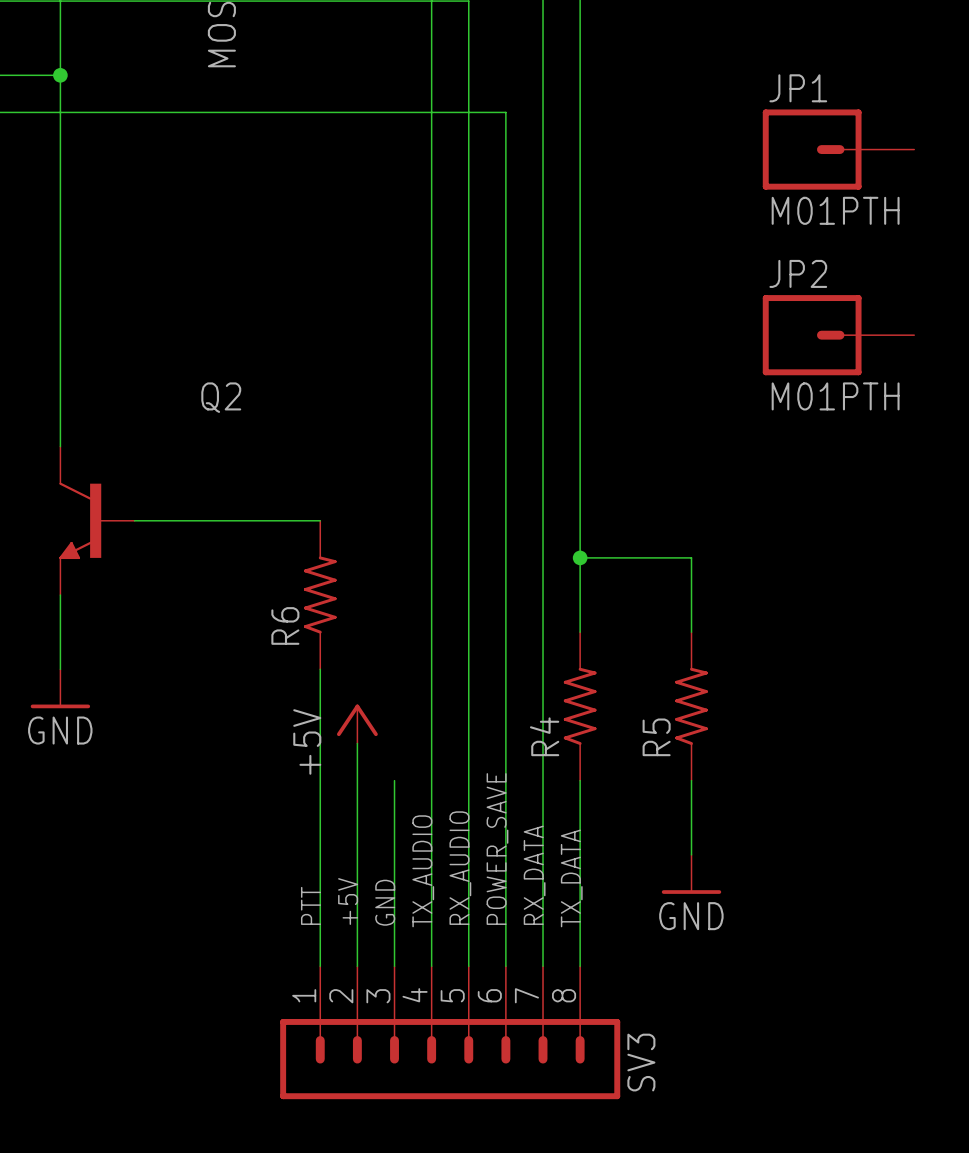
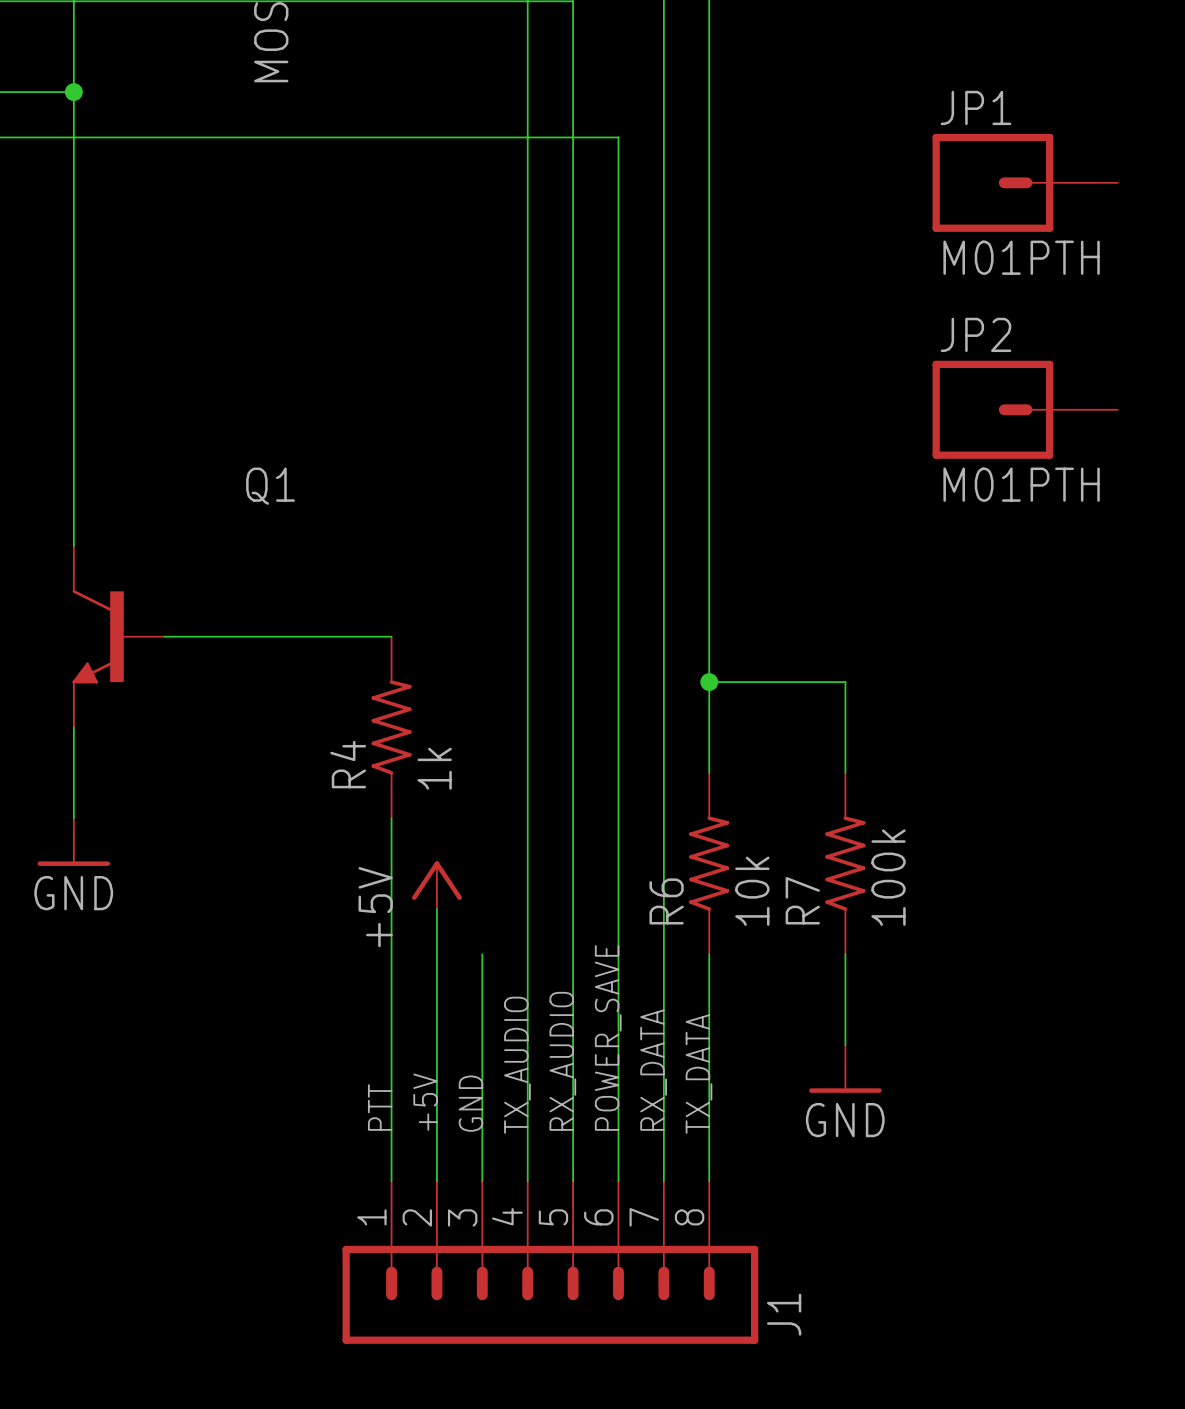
Q2 name: Q2 (221, 397) -> Q1 (270, 486)
R6 name: R6 (285, 625) -> R4 (348, 764)
R6 value: none -> 1k (434, 768)
R5 value: none -> 100k (888, 877)
R4 value: none -> 10k (752, 891)
R4 name: R4 (544, 736) -> R6 (666, 901)
R5 name: R5 (656, 737) -> R7 (802, 900)
SV3 name: SV3 (641, 1062) -> J1 (784, 1314)

